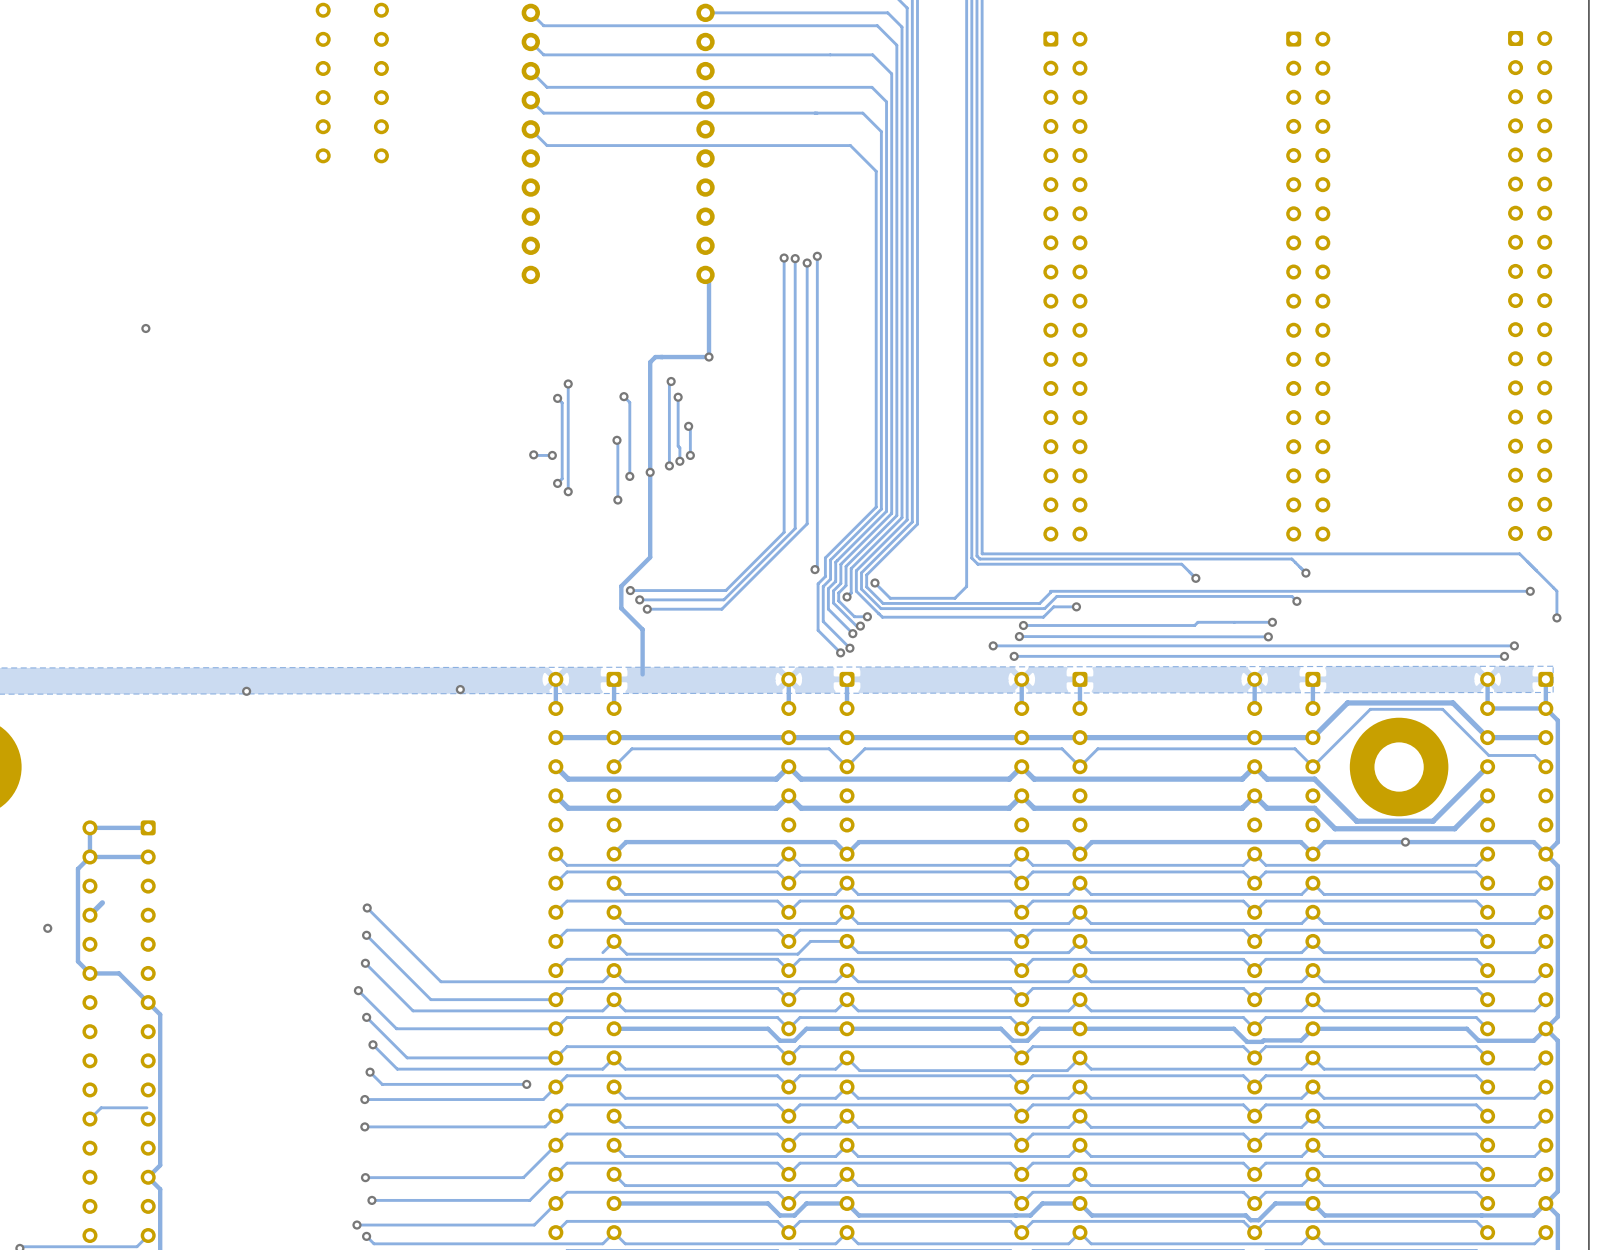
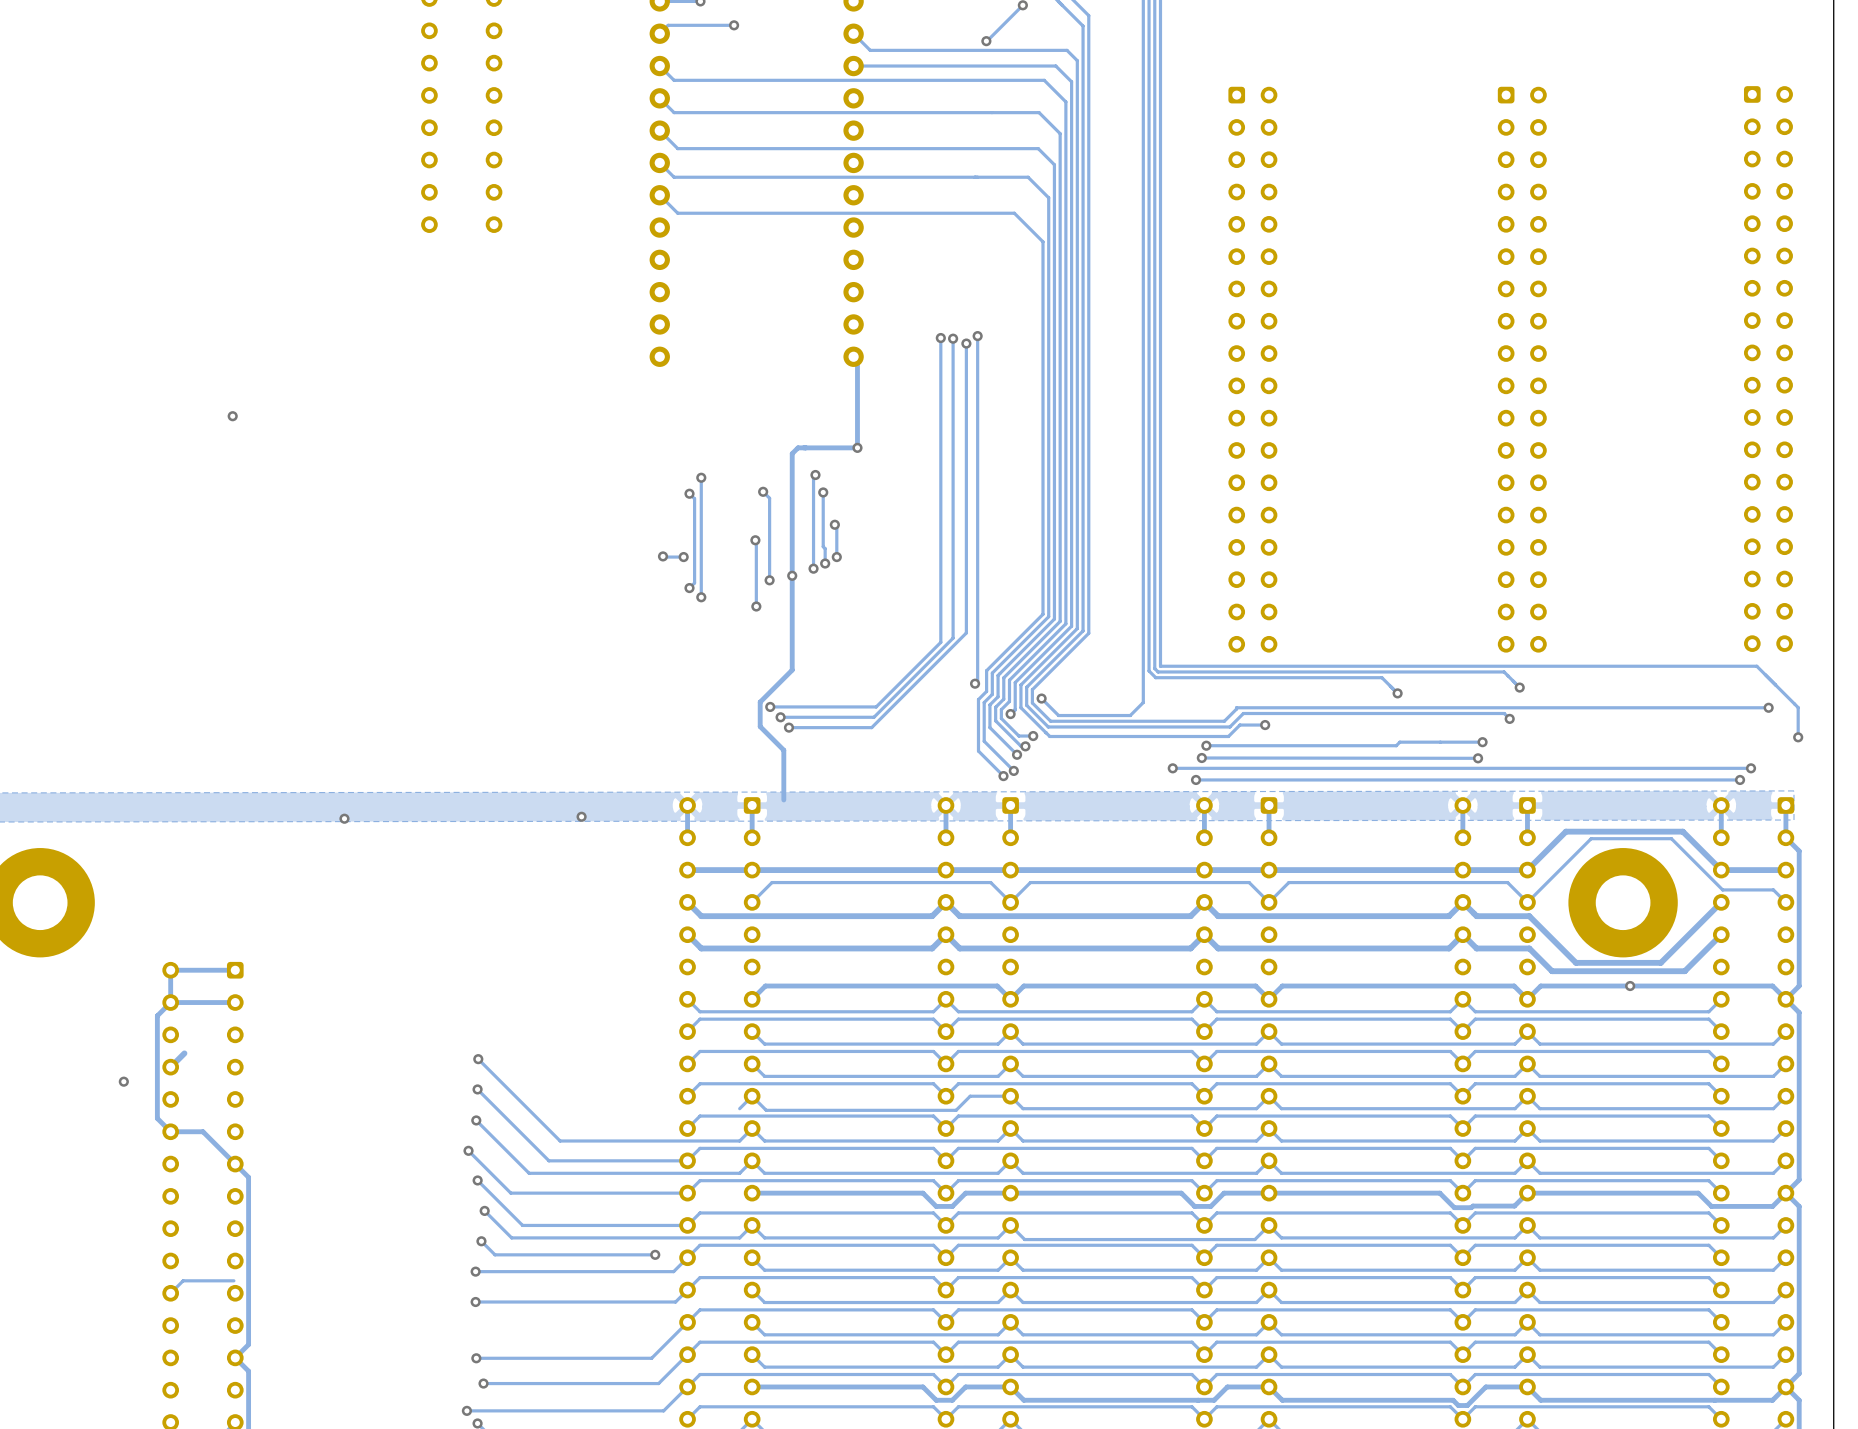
track: (1545, 708) (1487, 708) -> none

